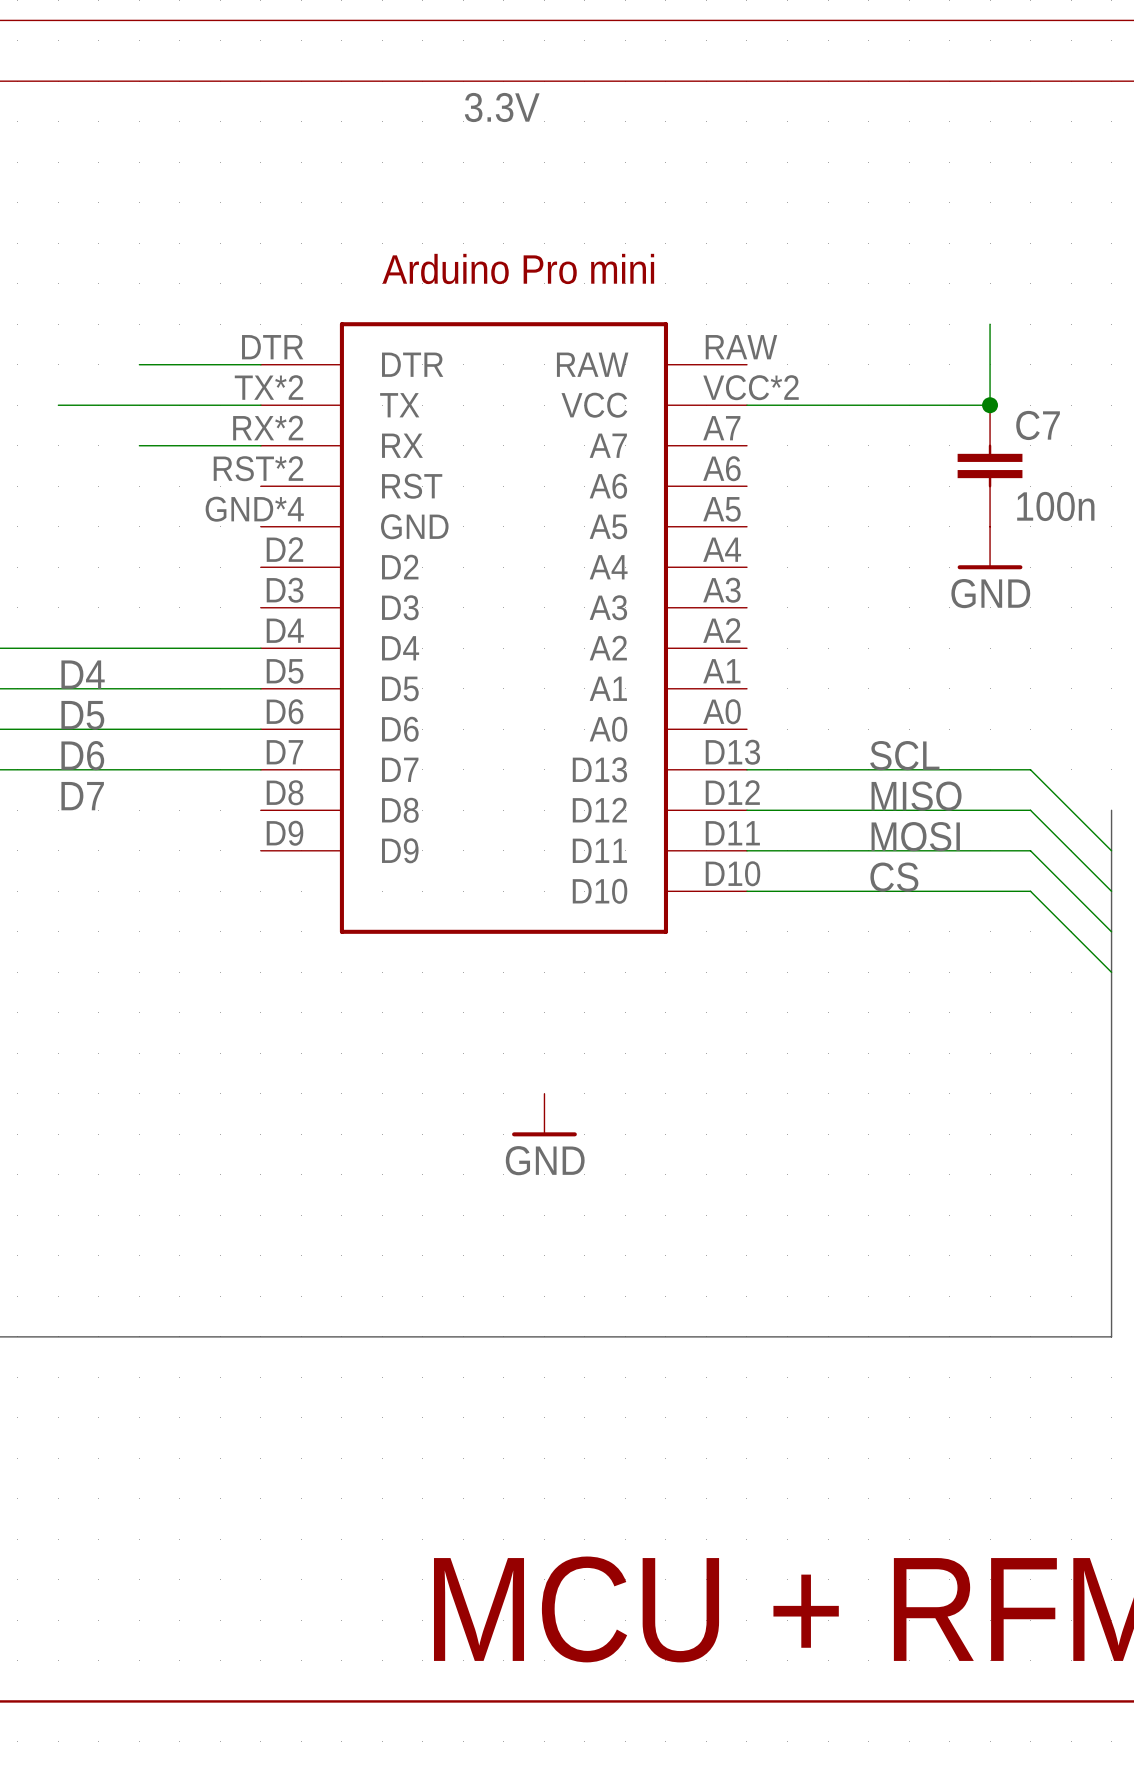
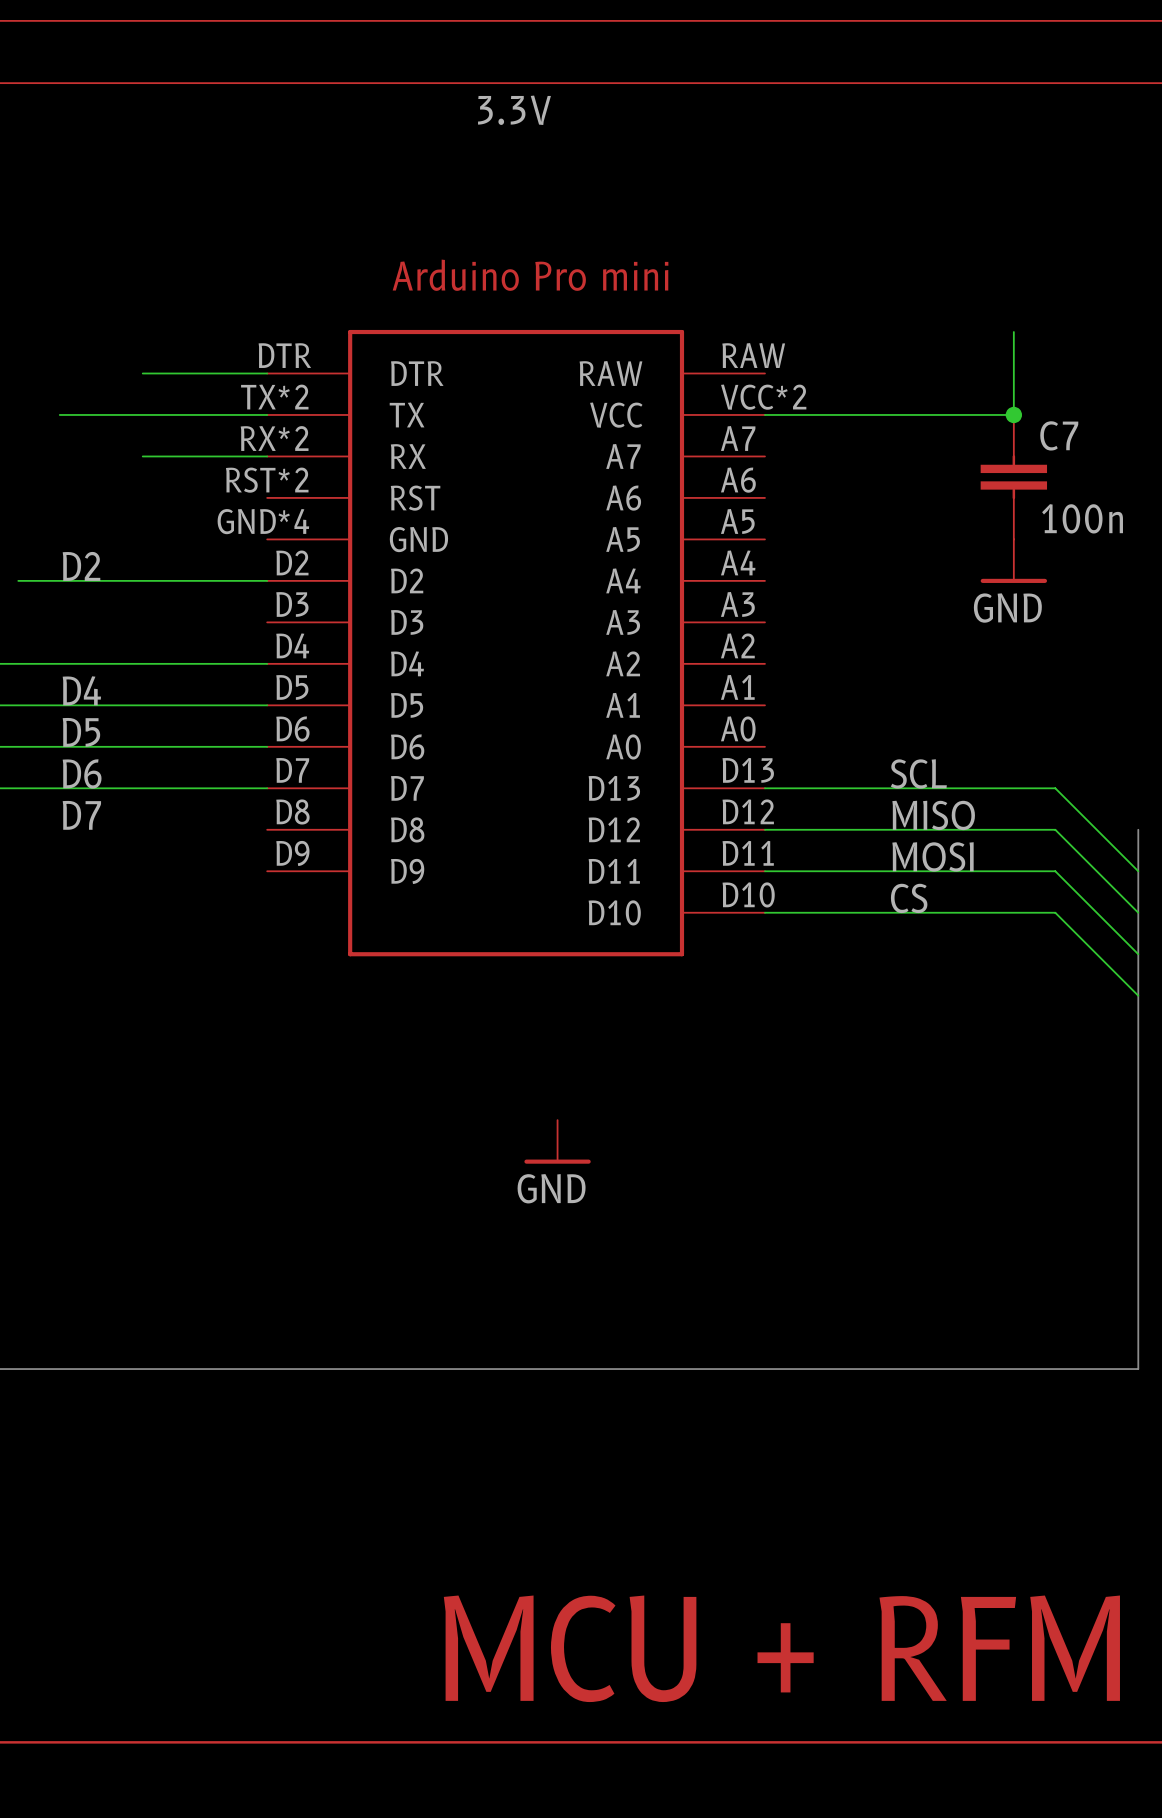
label: none -> D2 (81, 566)
wire: none -> (18, 580) (267, 580)

